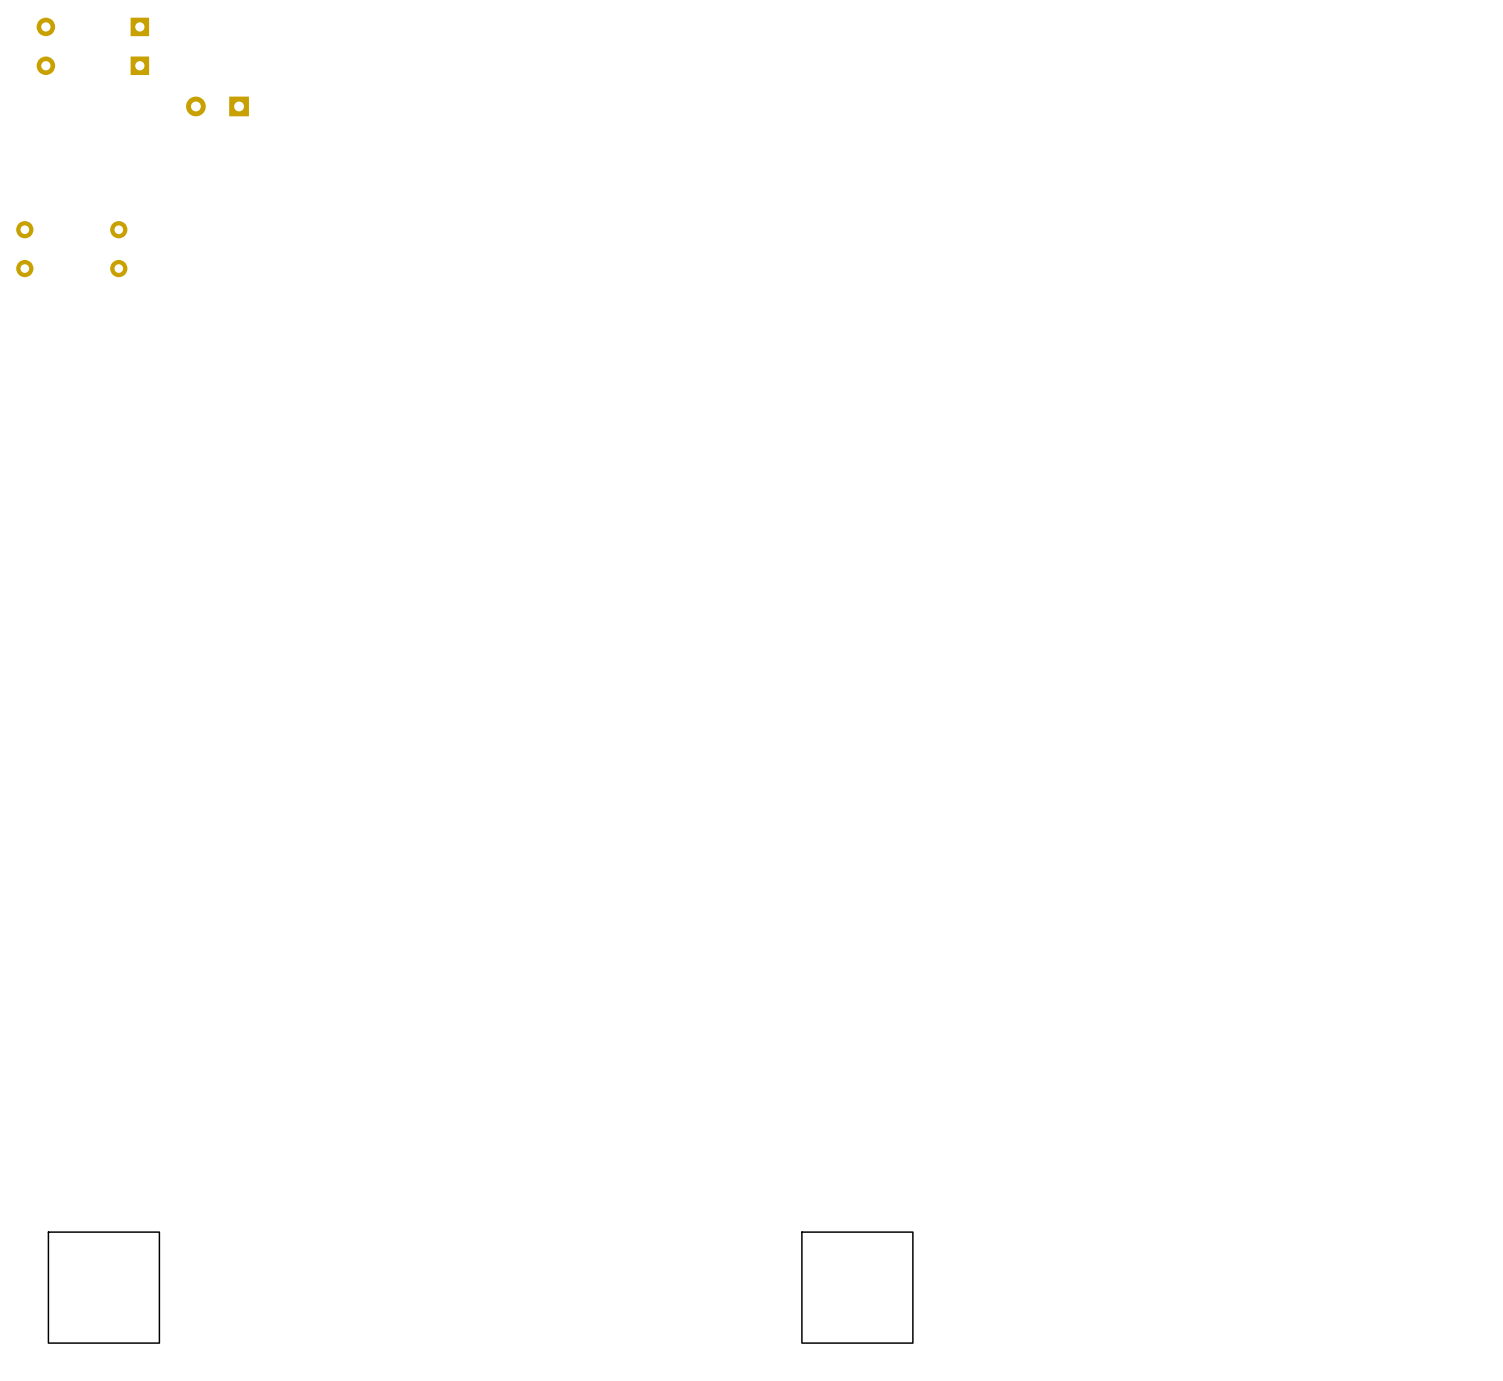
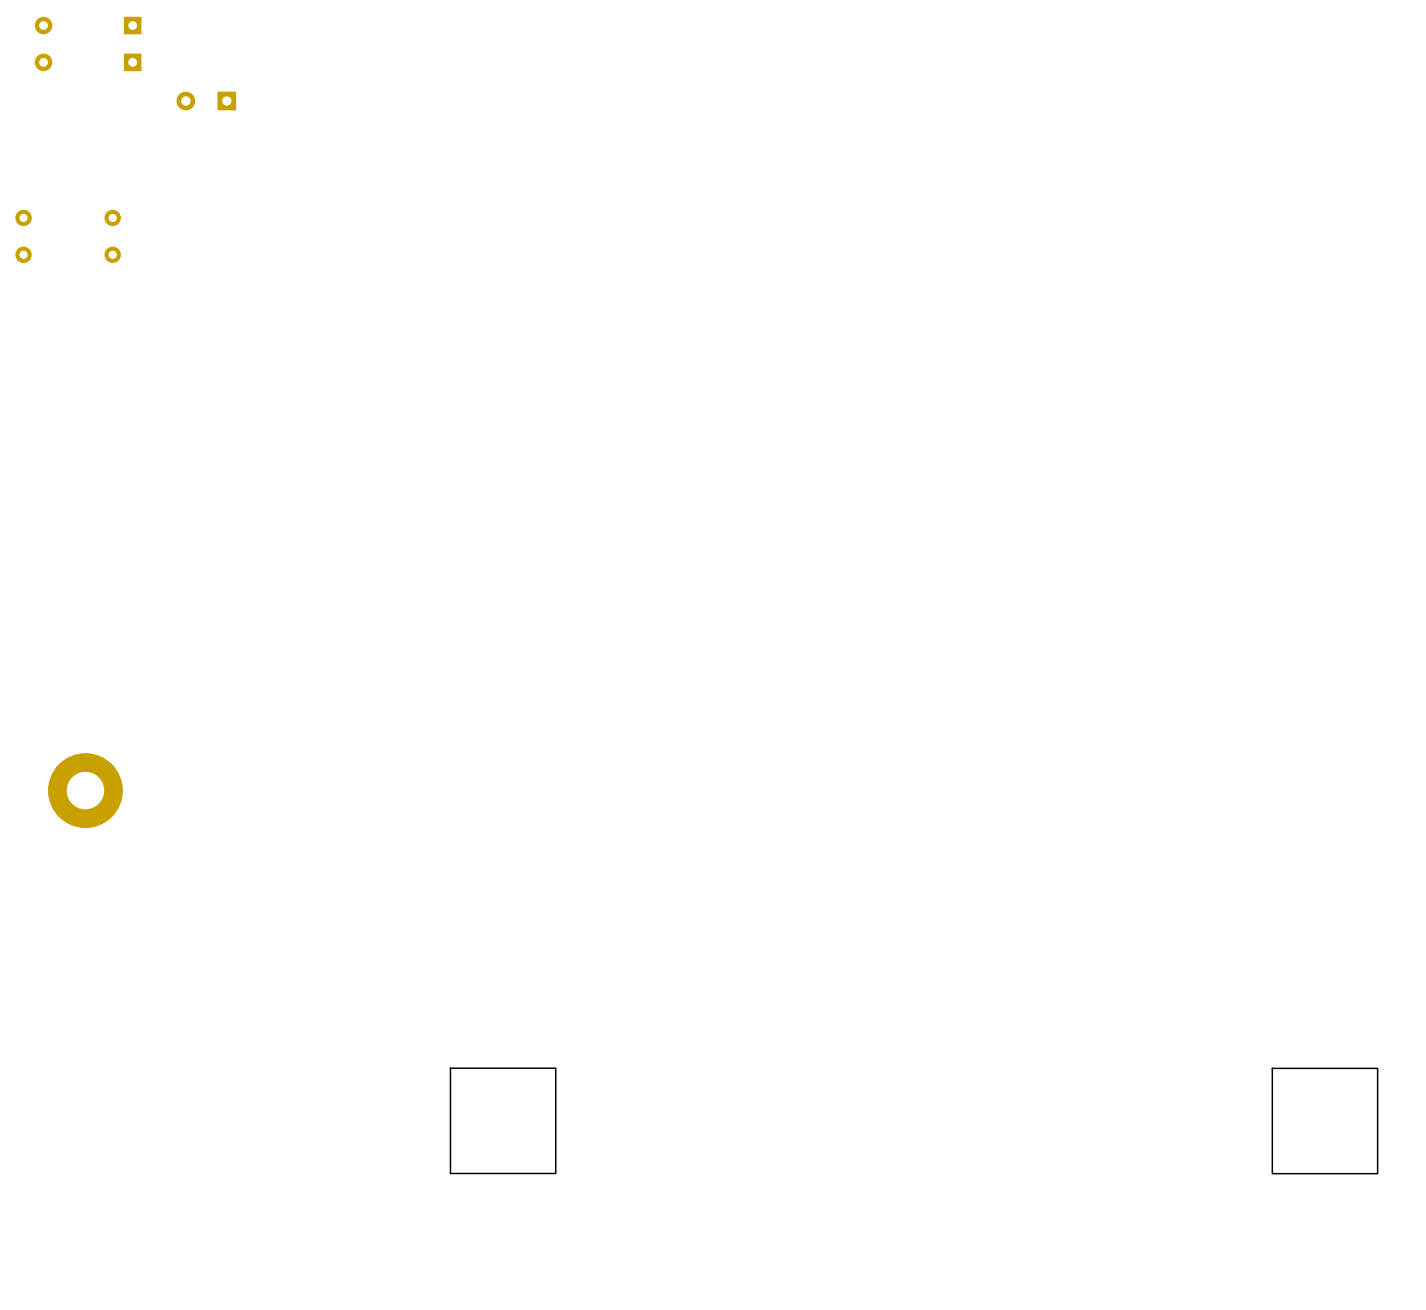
part: none -> (85, 790)
part: none -> (503, 1120)
part: none -> (1324, 1121)
part: (103, 1287) -> none
part: (857, 1287) -> none

